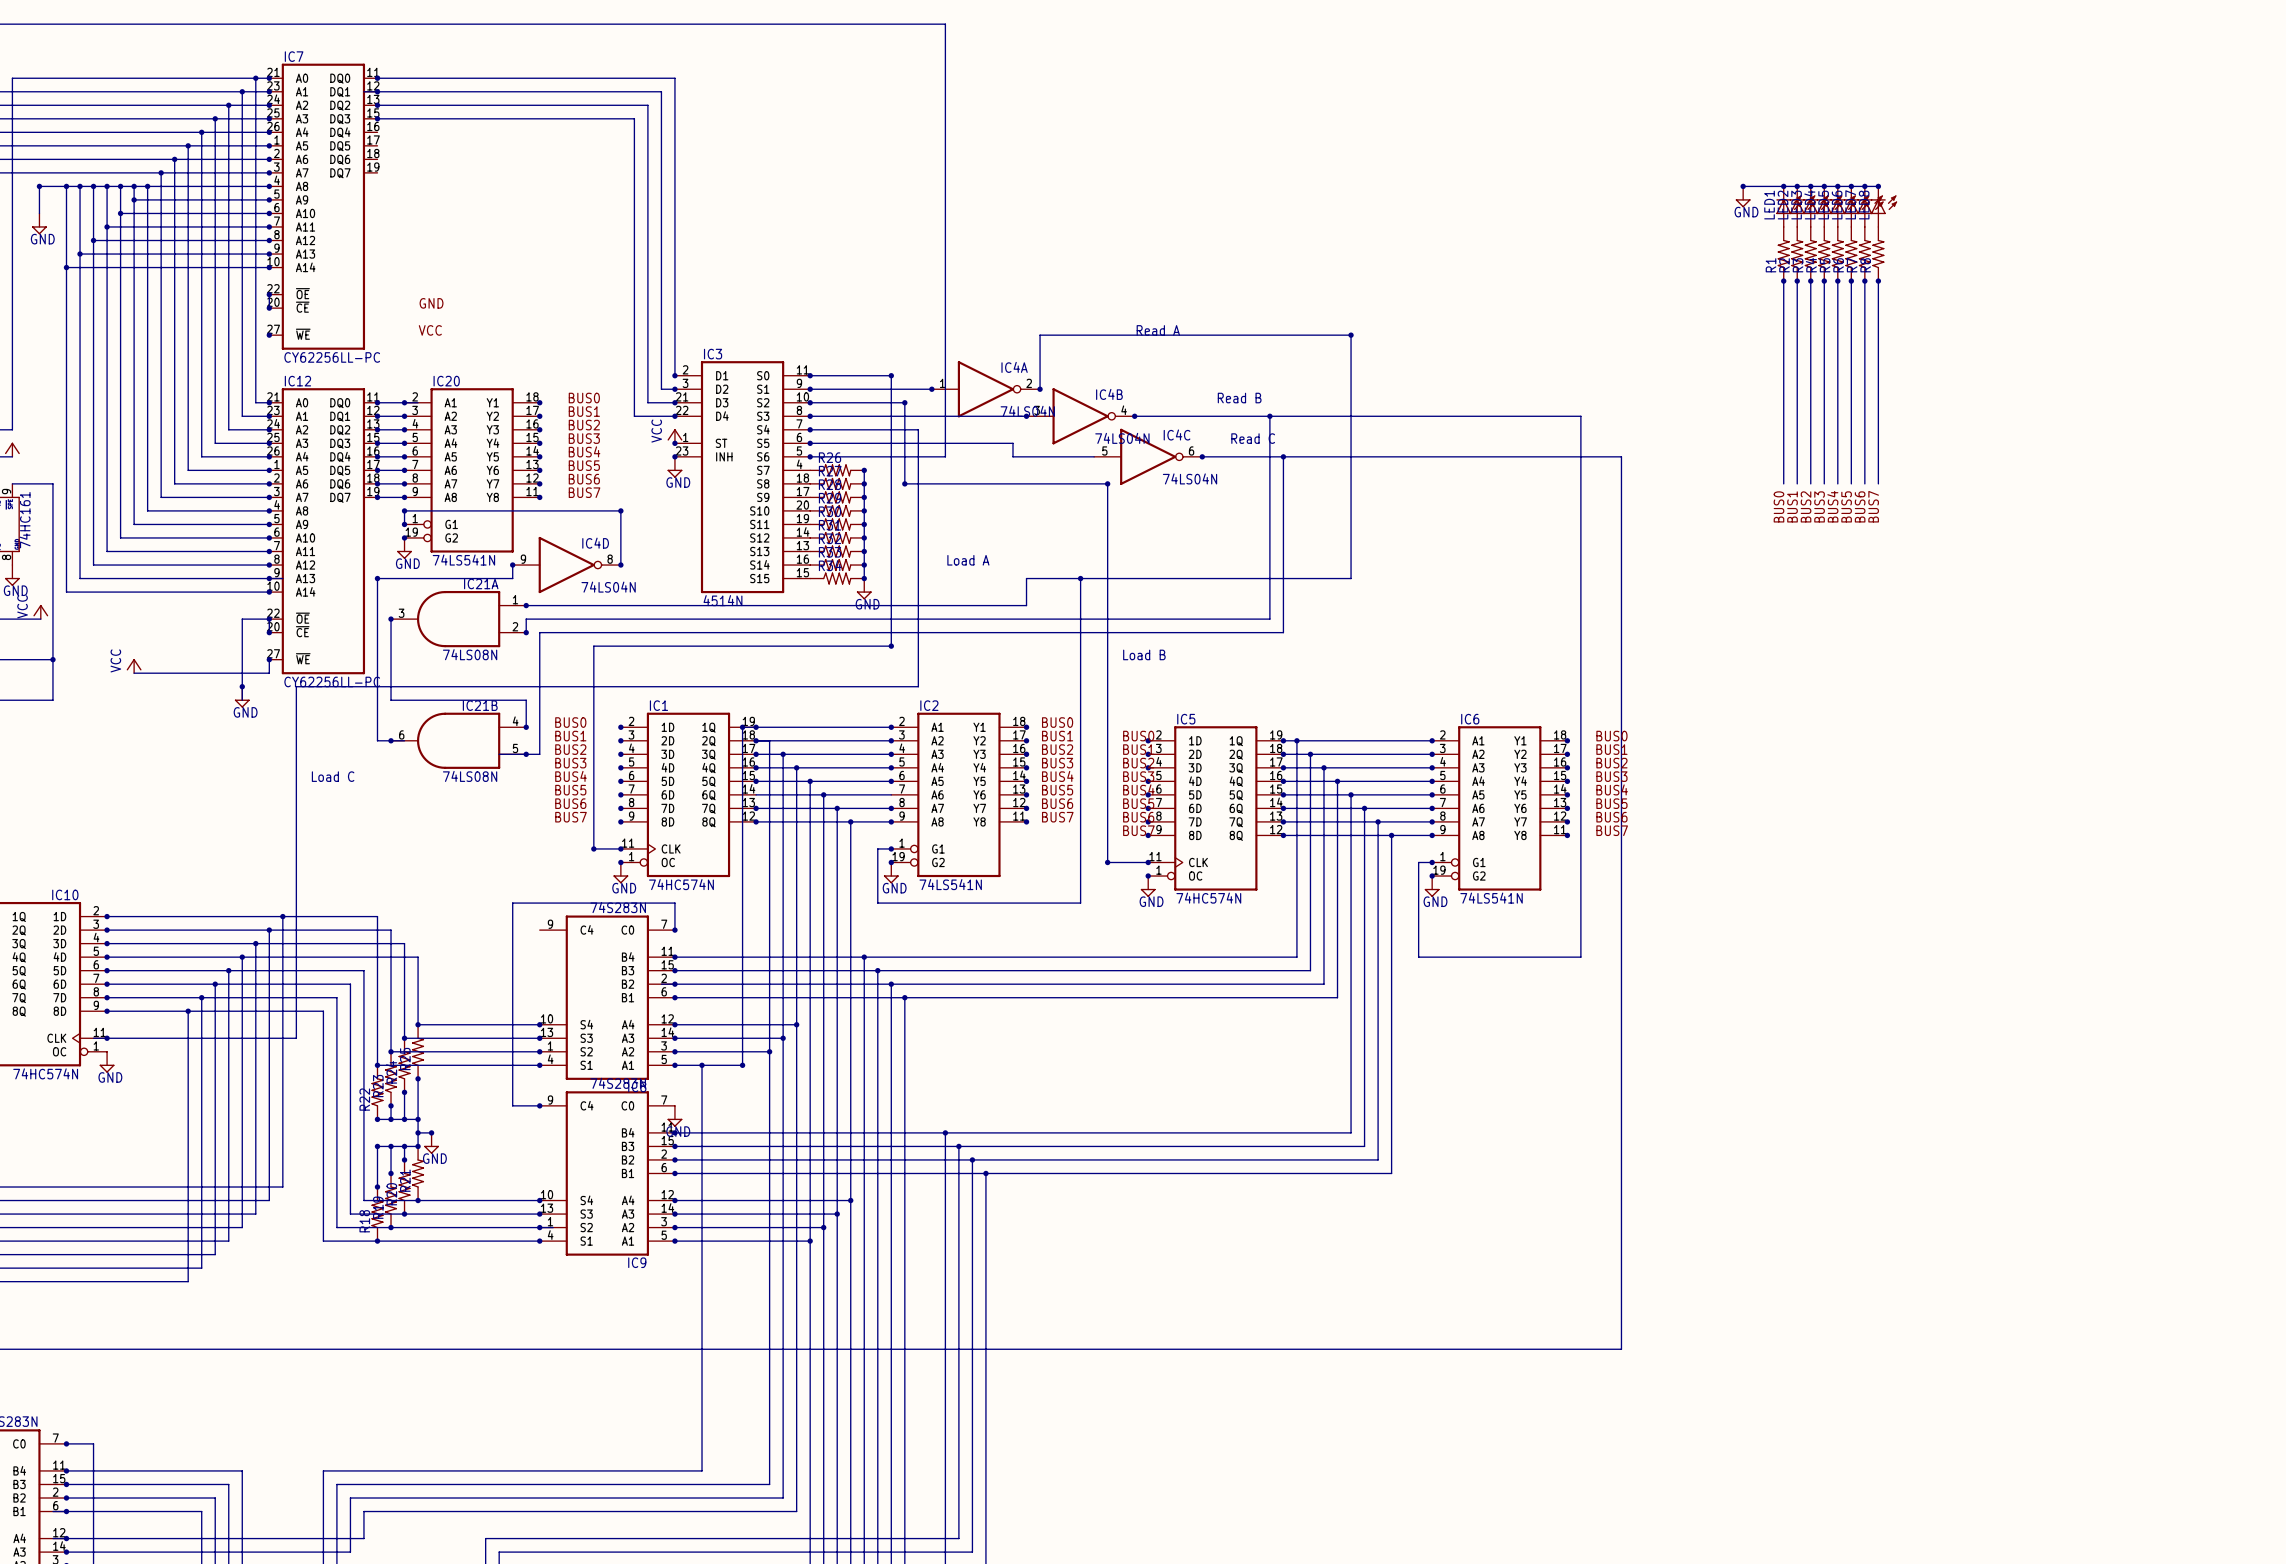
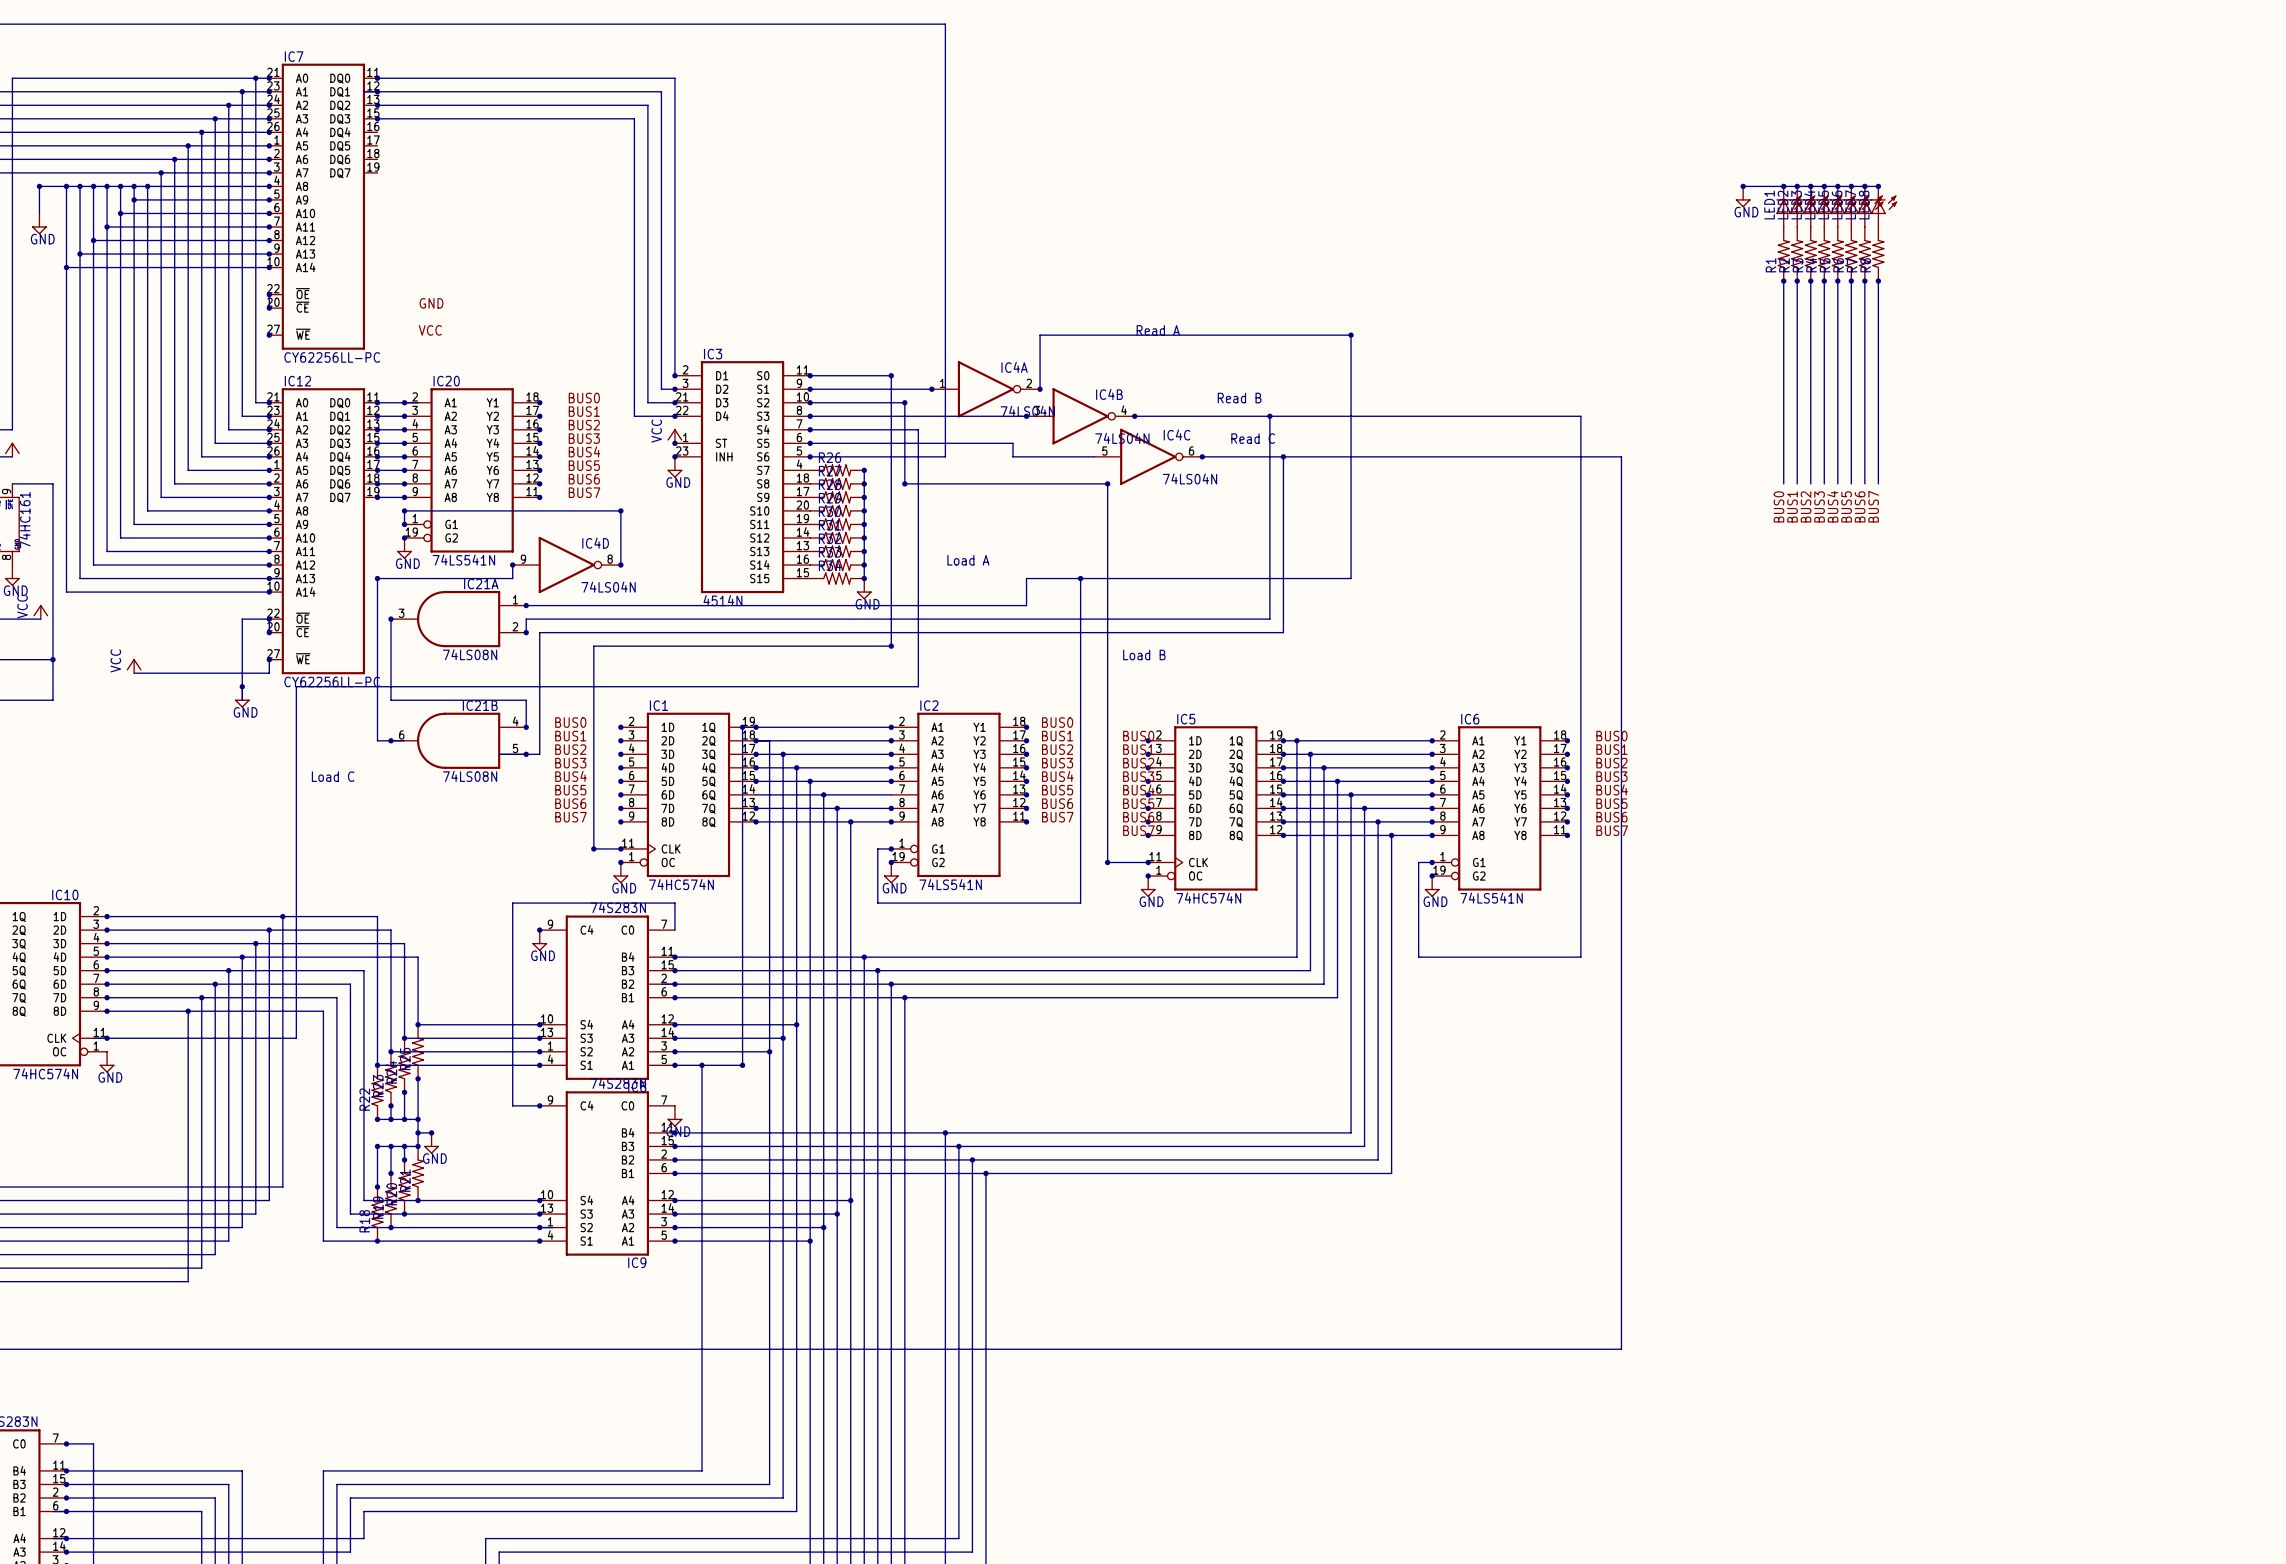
junction: none -> (539, 930)
junction: (674, 930) -> none
power symbol: none -> GND (539, 940)

